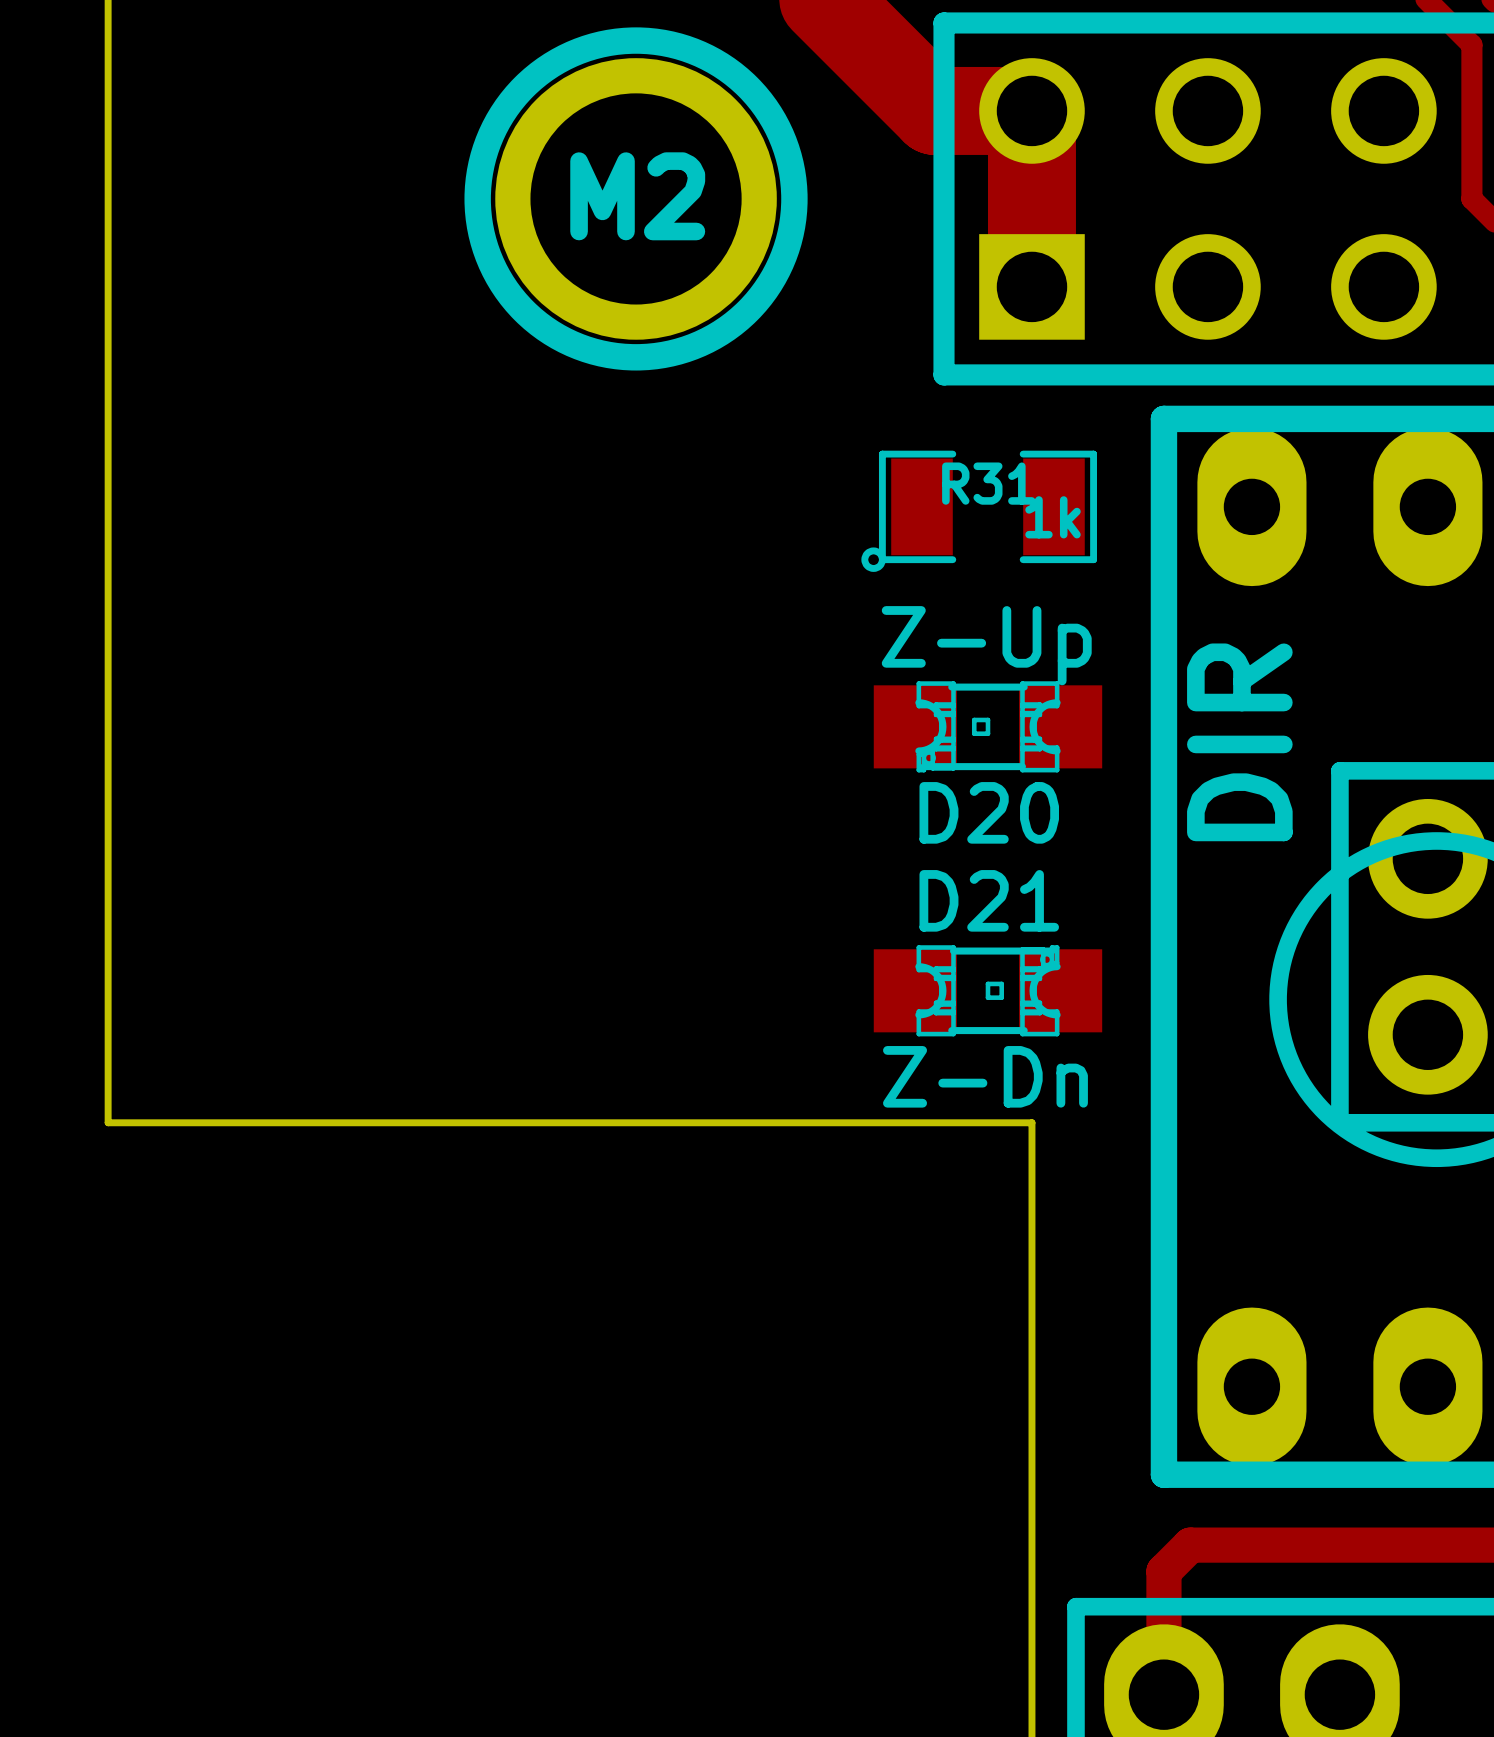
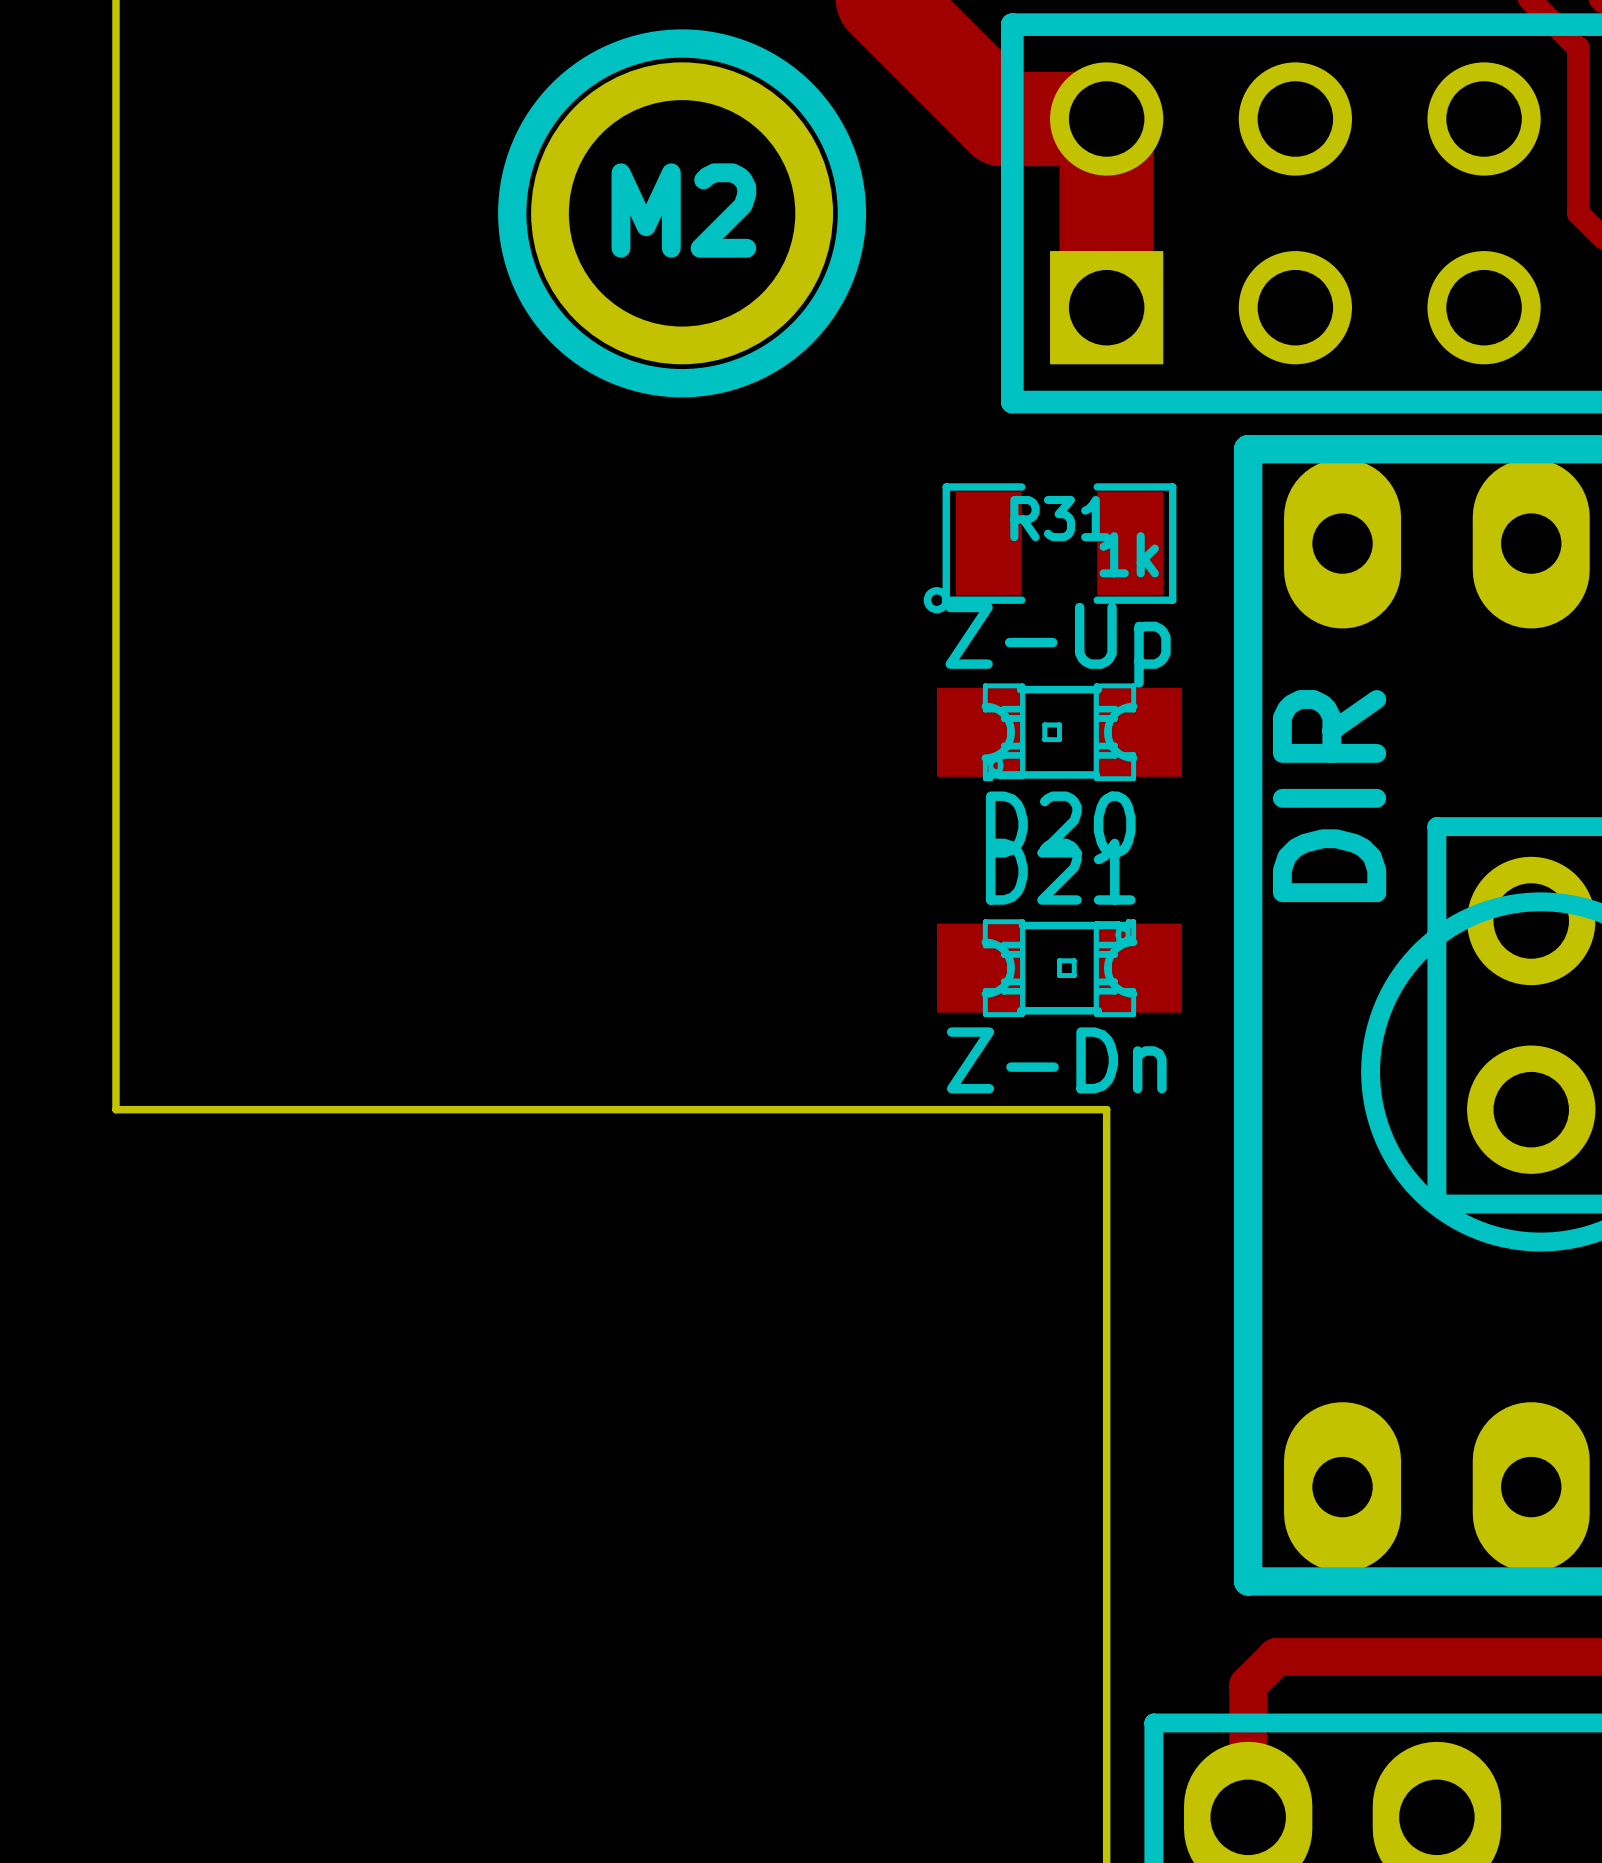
D20 position: (987, 726) -> (1059, 732)
D21 position: (987, 990) -> (1059, 968)
board edge: (108, 1034) (108, 1122) (1031, 1122) -> (115, 1109) (1106, 1109) (1106, 1204)

